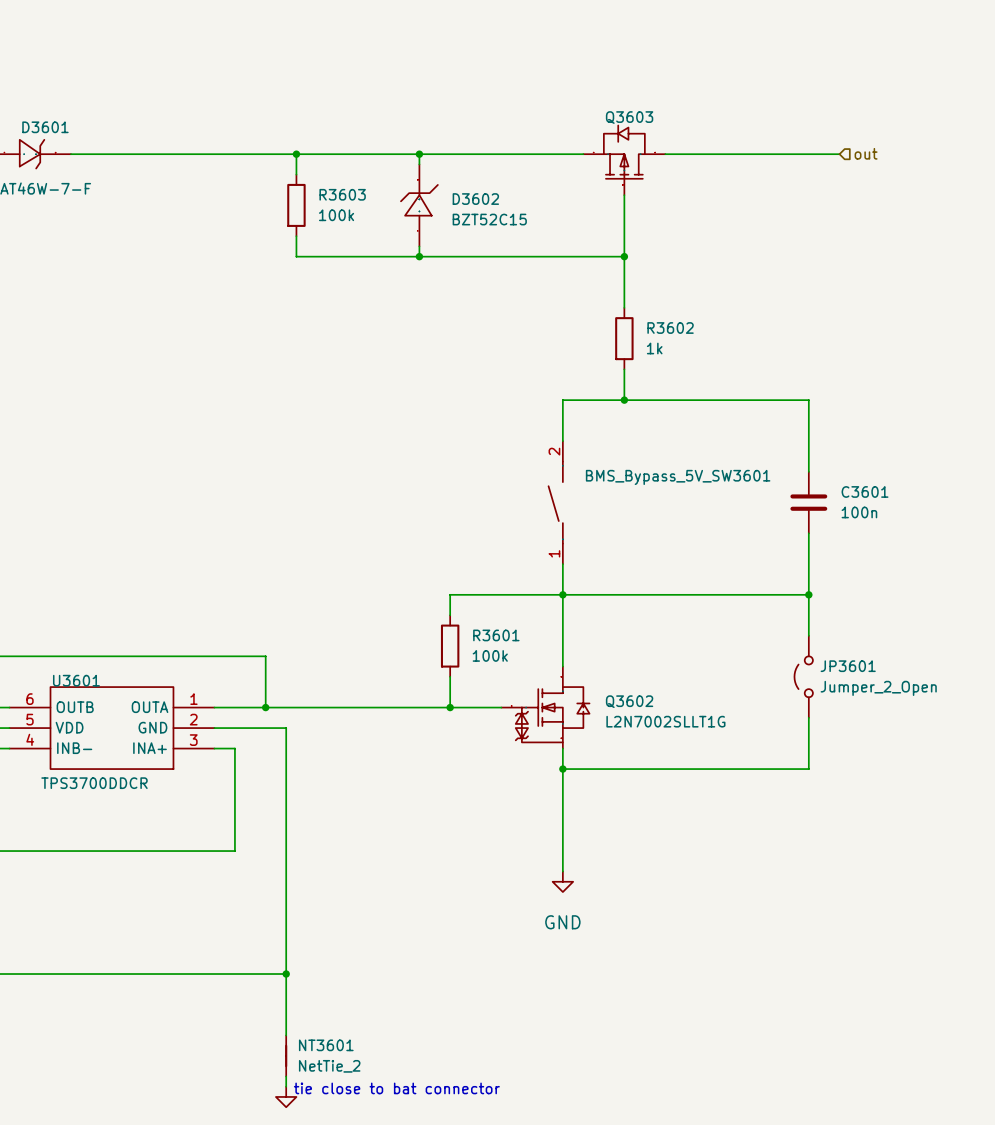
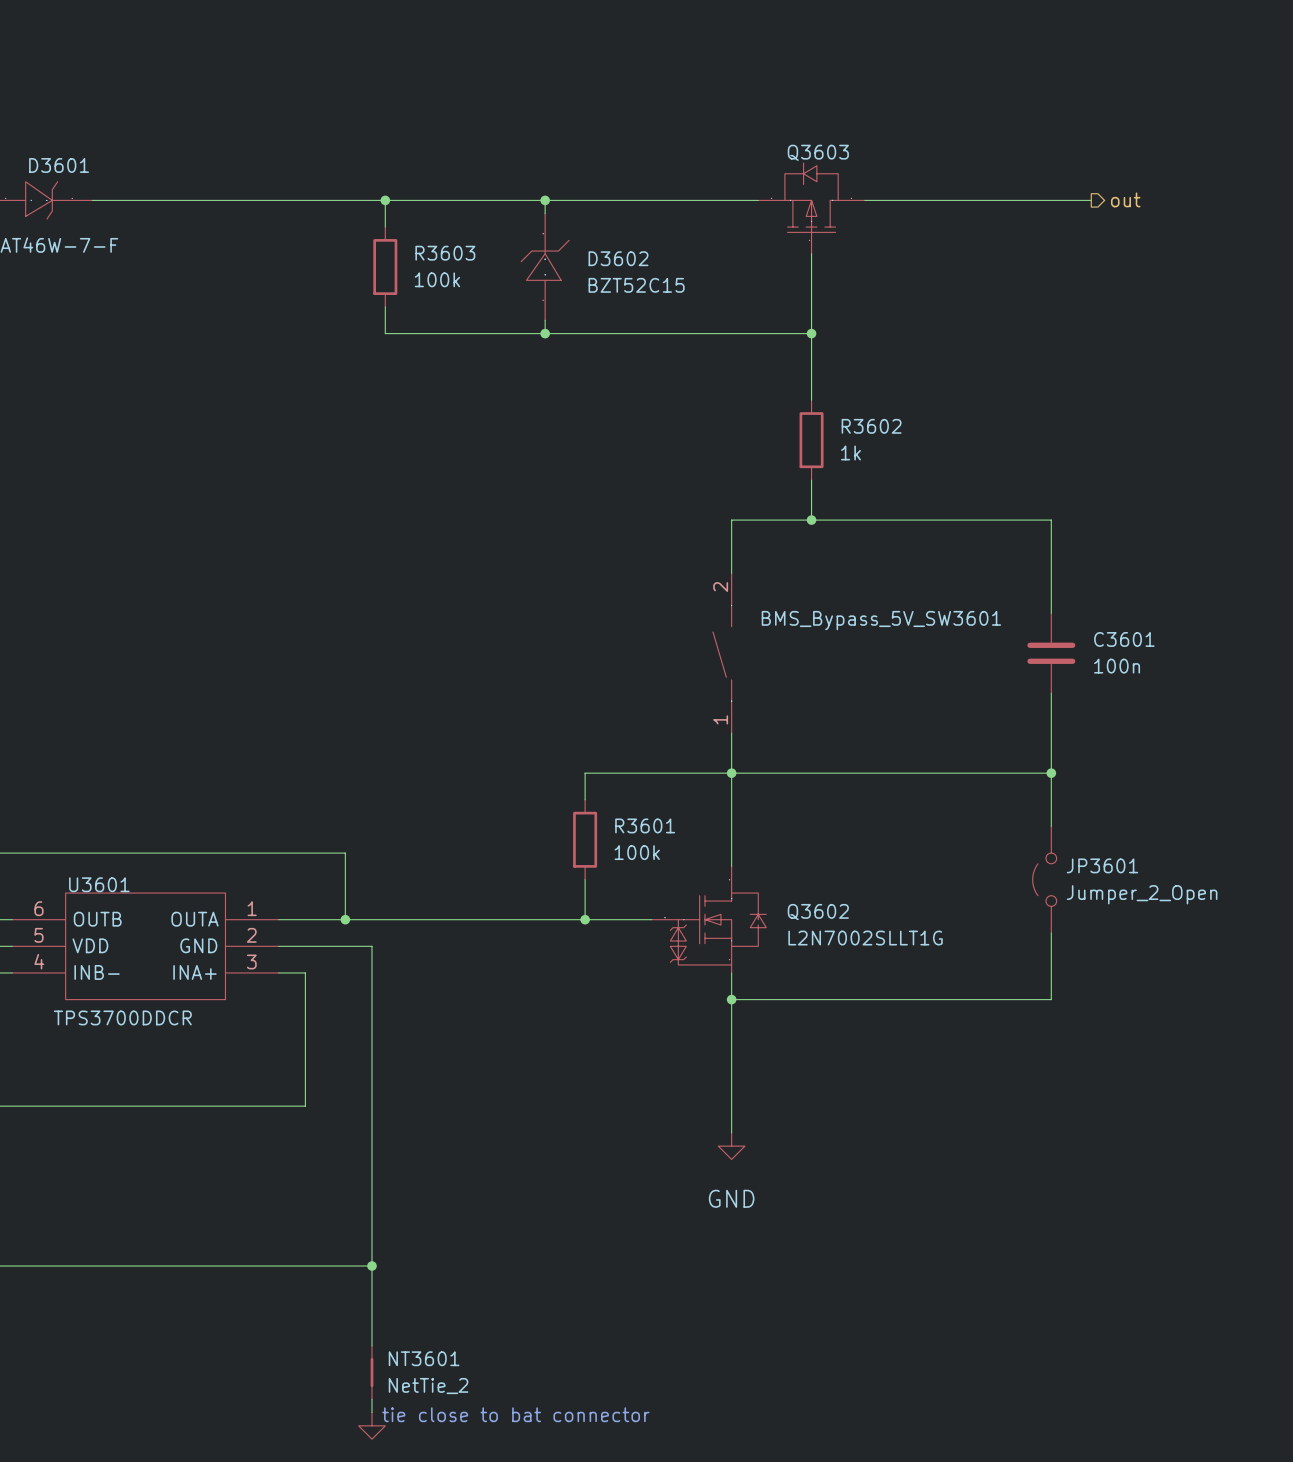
hierarchical label shape: input (866, 153) -> output (1125, 199)

